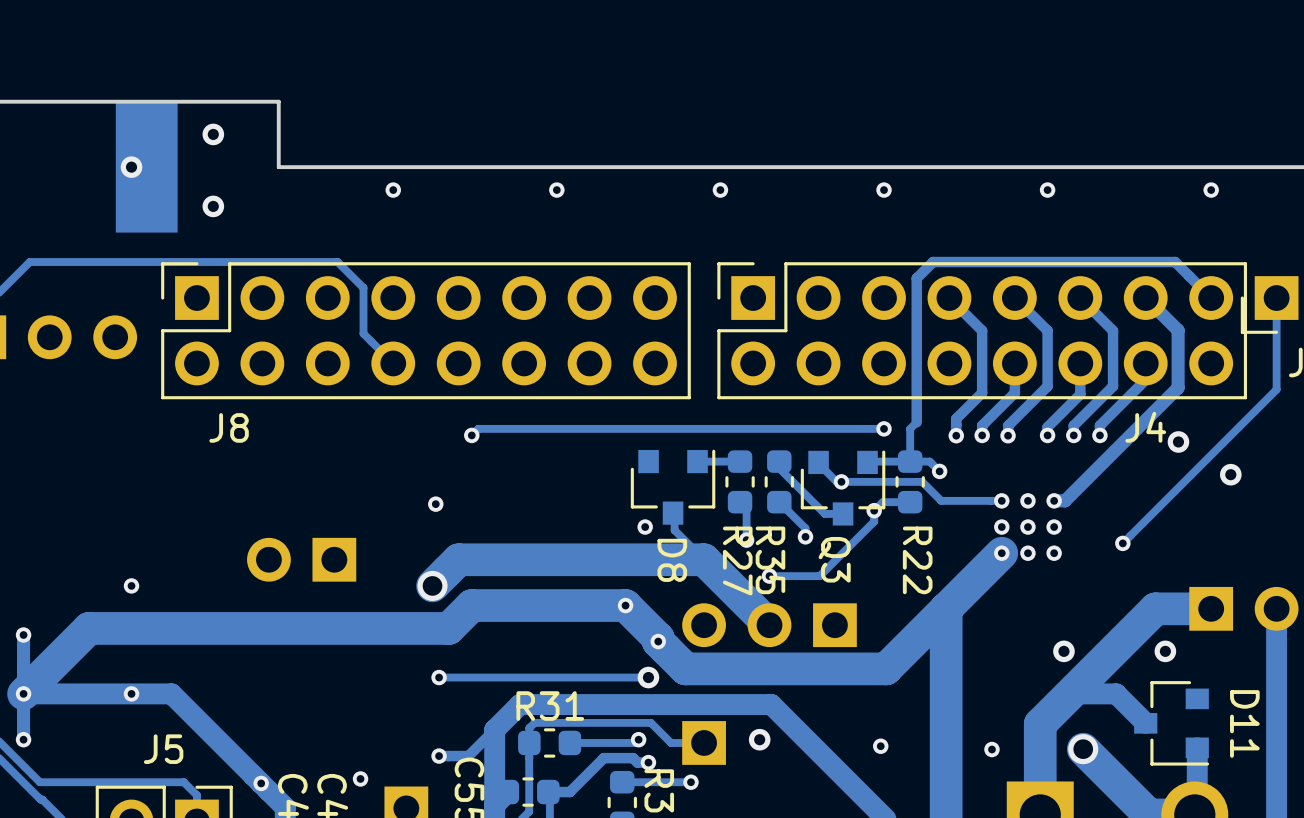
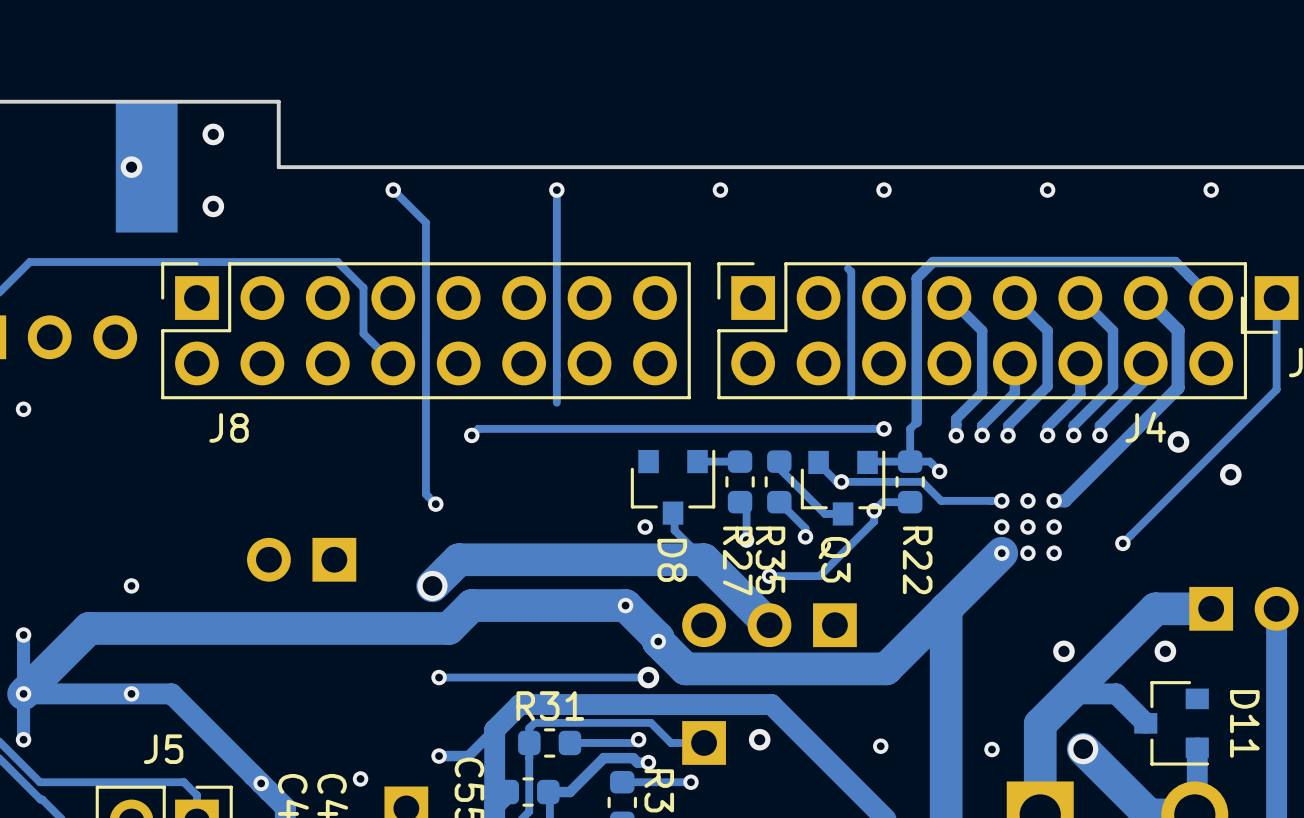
track: none -> (393, 190) (425, 222) (425, 494) (435, 504)
track: none -> (556, 190) (556, 402)
track: none -> (848, 268) (851, 271) (851, 396)
via: none -> (23, 409)

